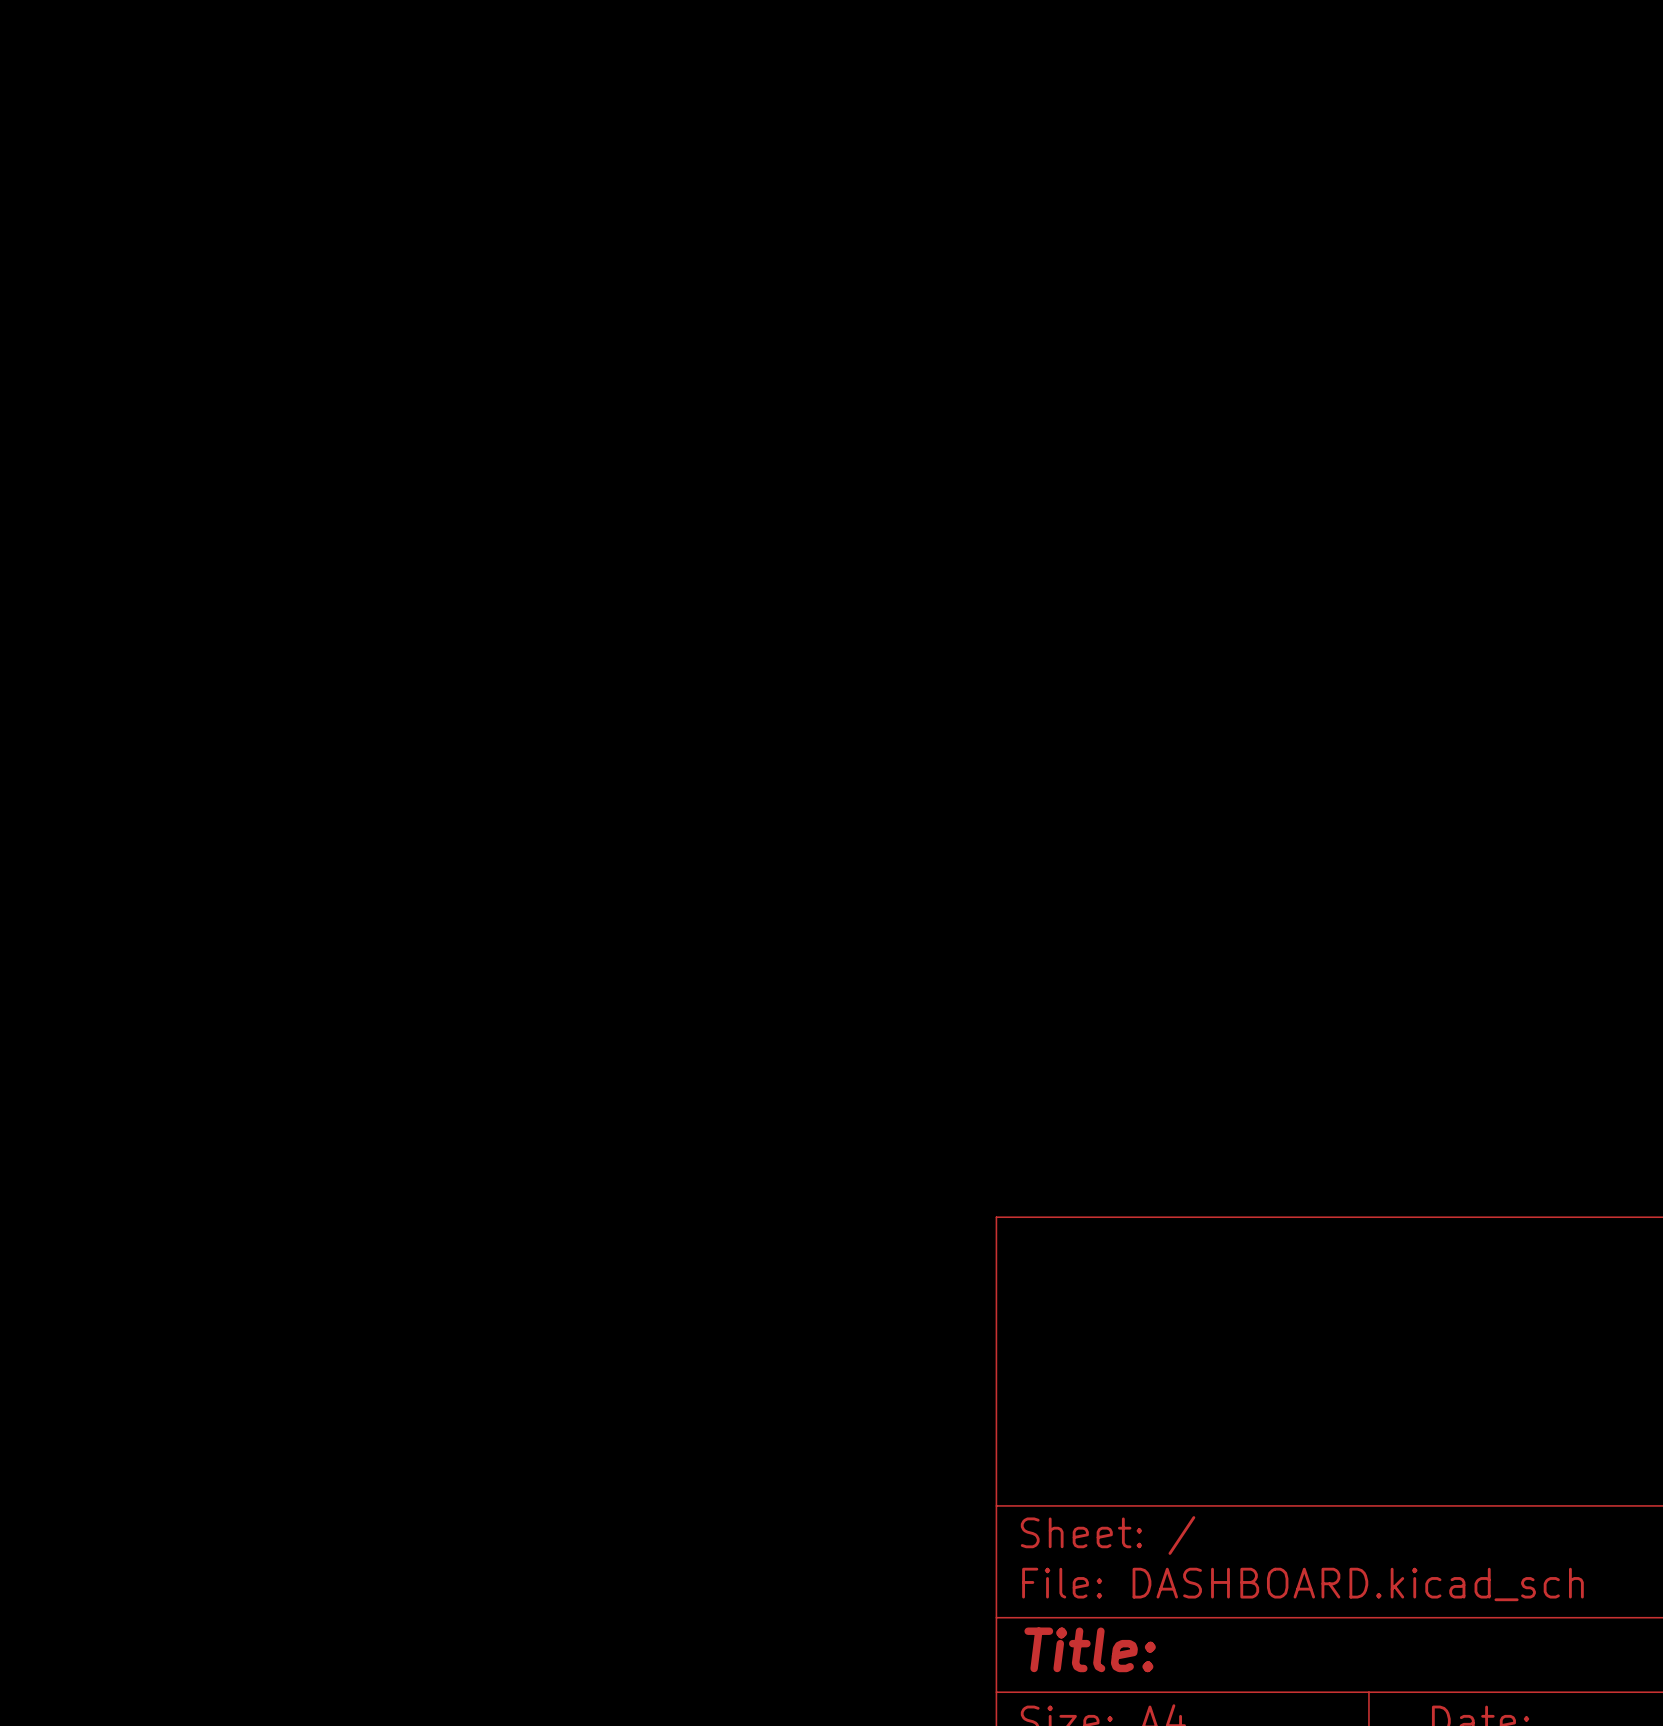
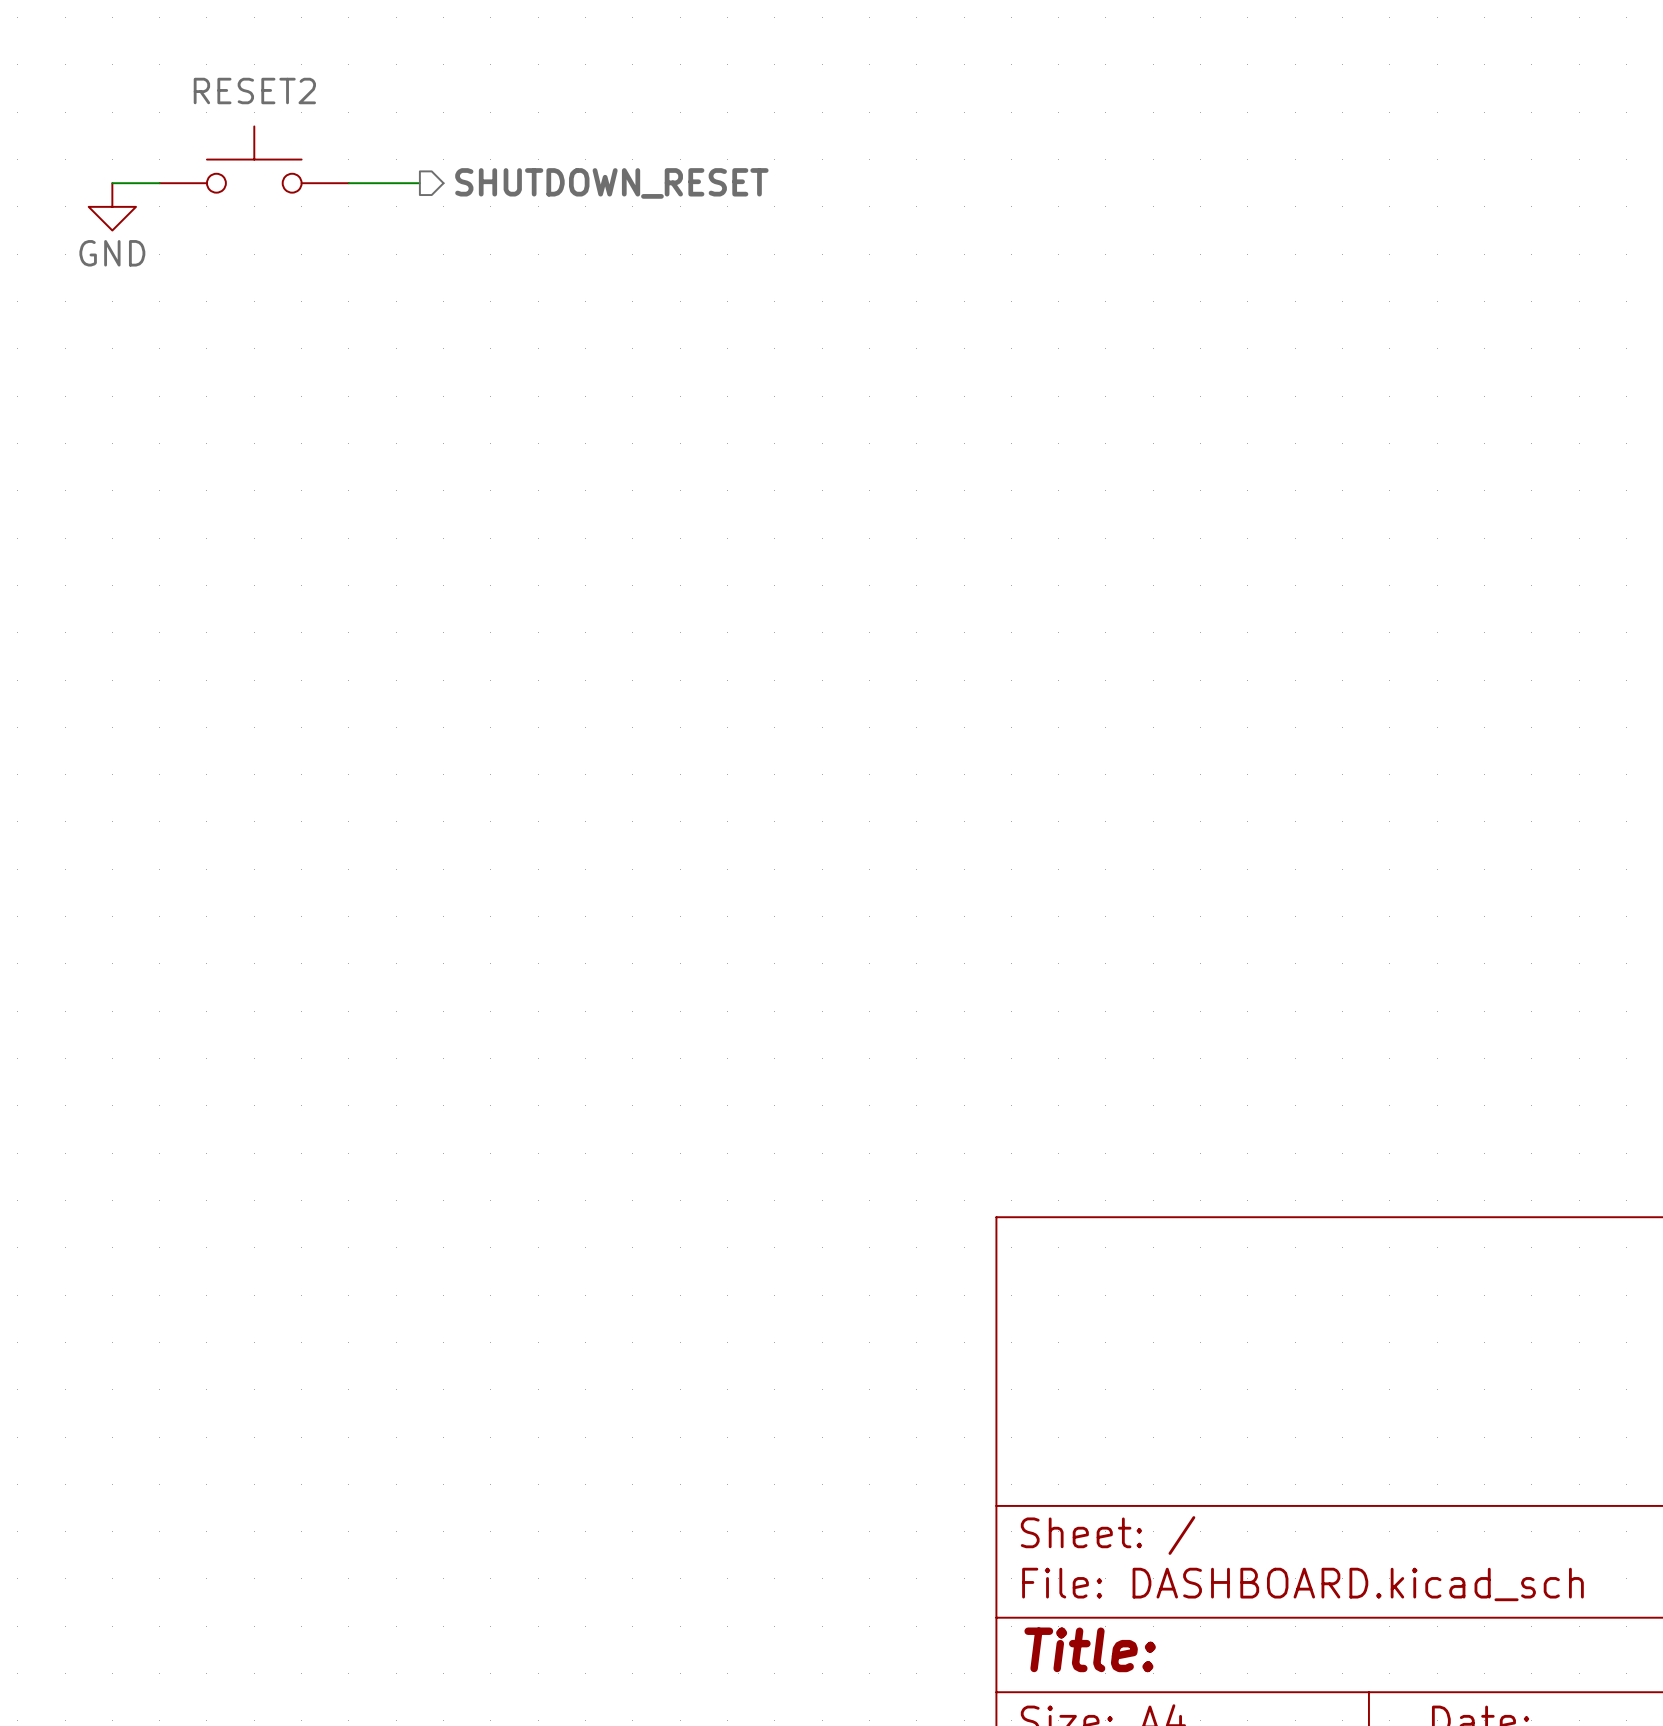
RESET2: none -> (254, 159)
wire: none -> (112, 183) (159, 183)
wire: none -> (348, 183) (419, 183)
hierarchical label: none -> SHUTDOWN_RESET (611, 183)
power symbol: none -> GND (112, 206)

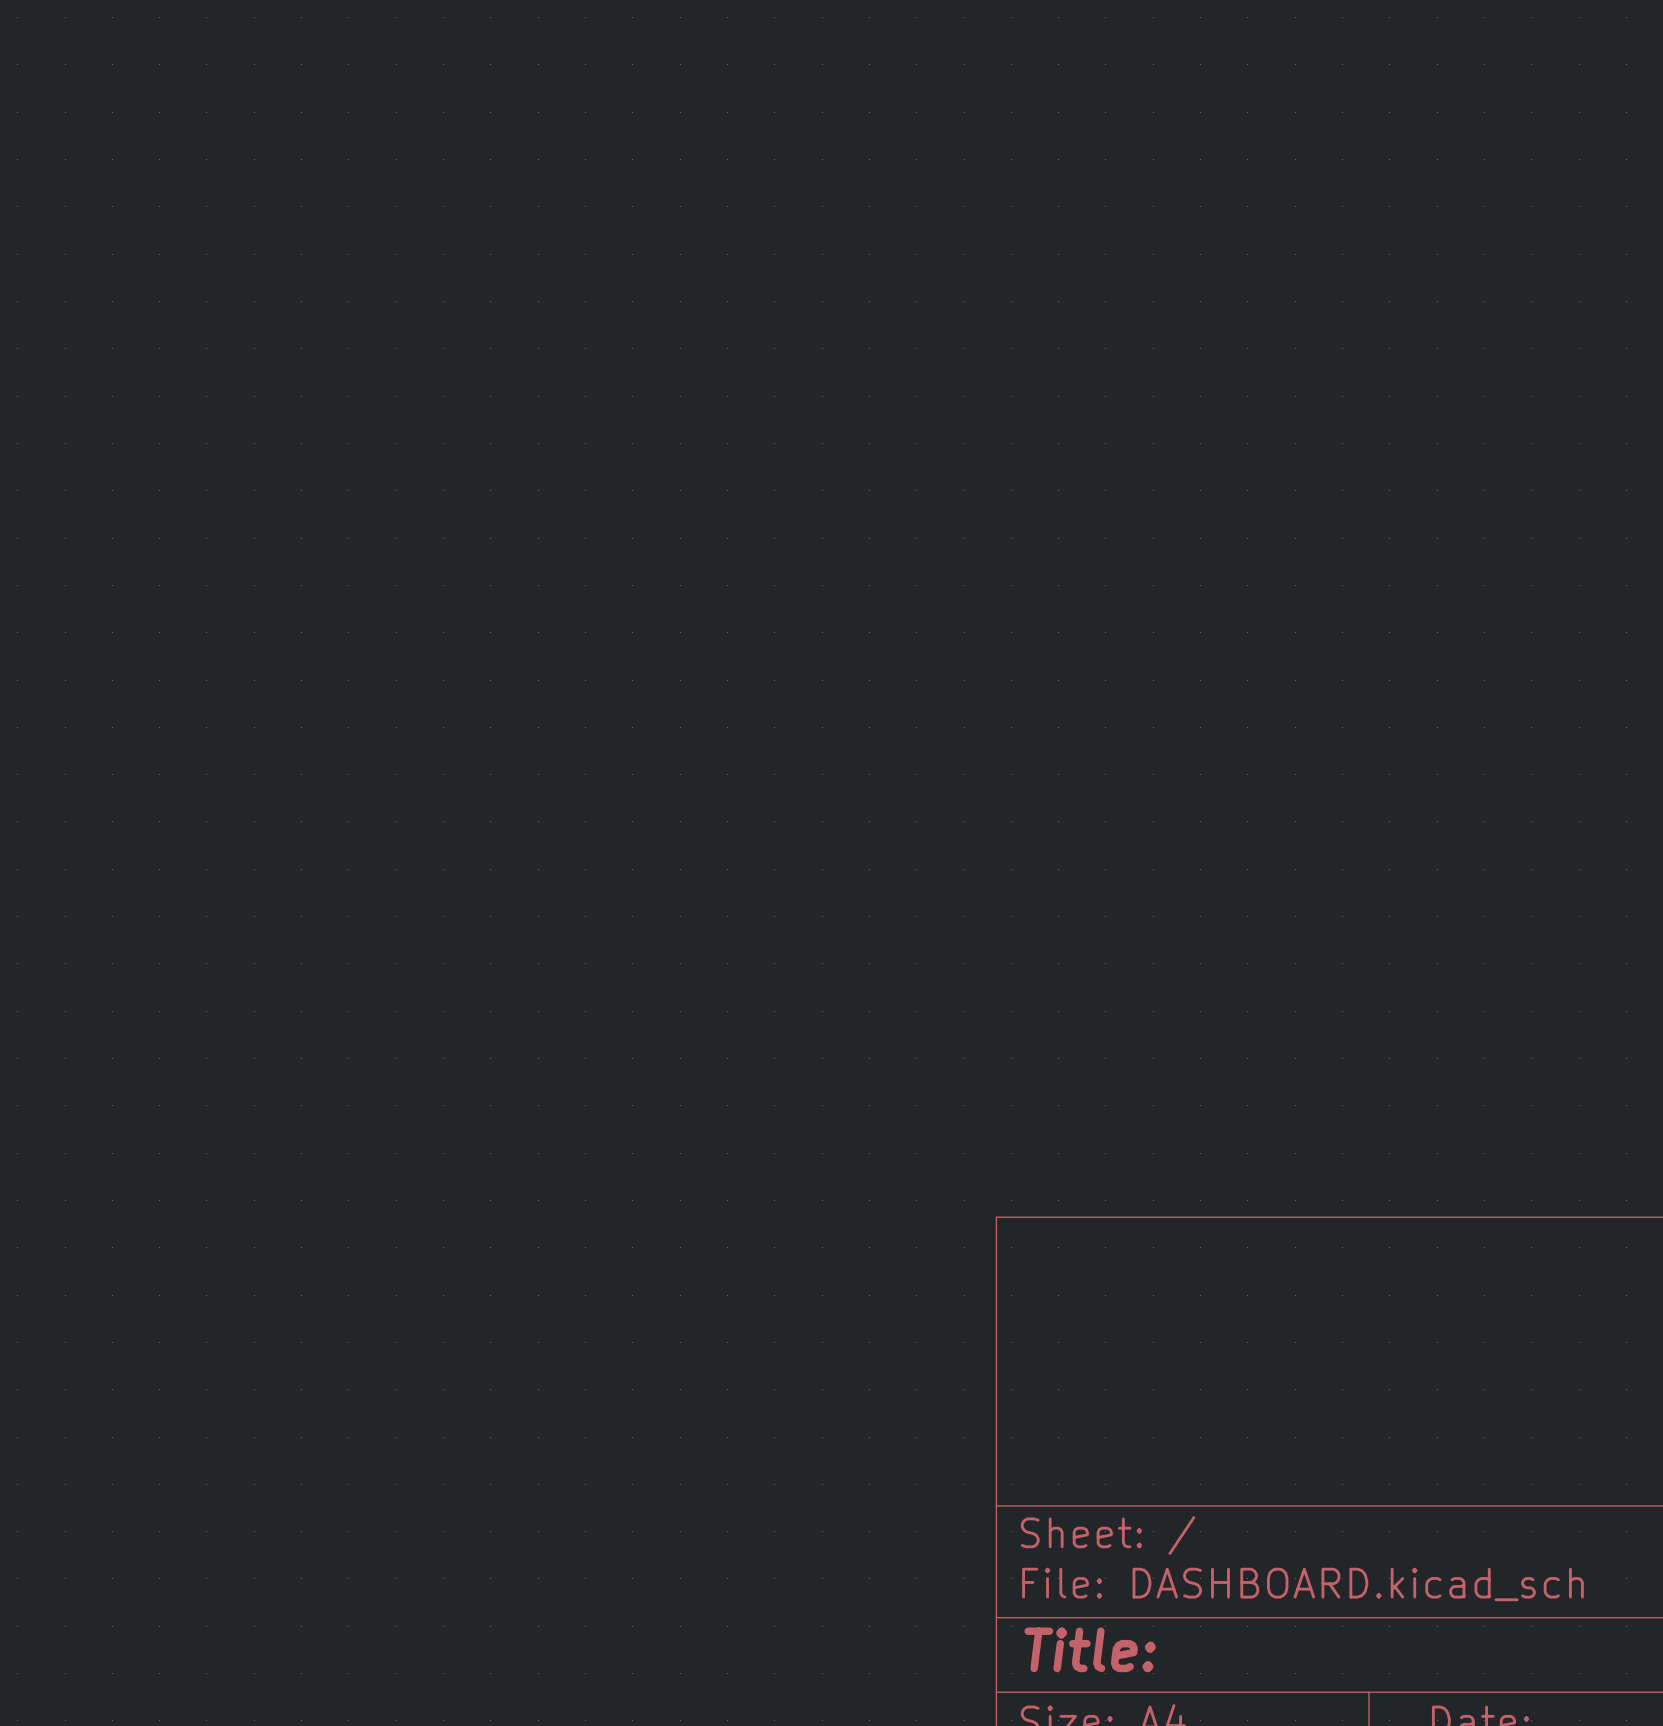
RESET2: (254, 159) -> none
wire: (112, 183) (159, 183) -> none
wire: (348, 183) (419, 183) -> none
hierarchical label: SHUTDOWN_RESET (611, 183) -> none
power symbol: GND (112, 206) -> none

